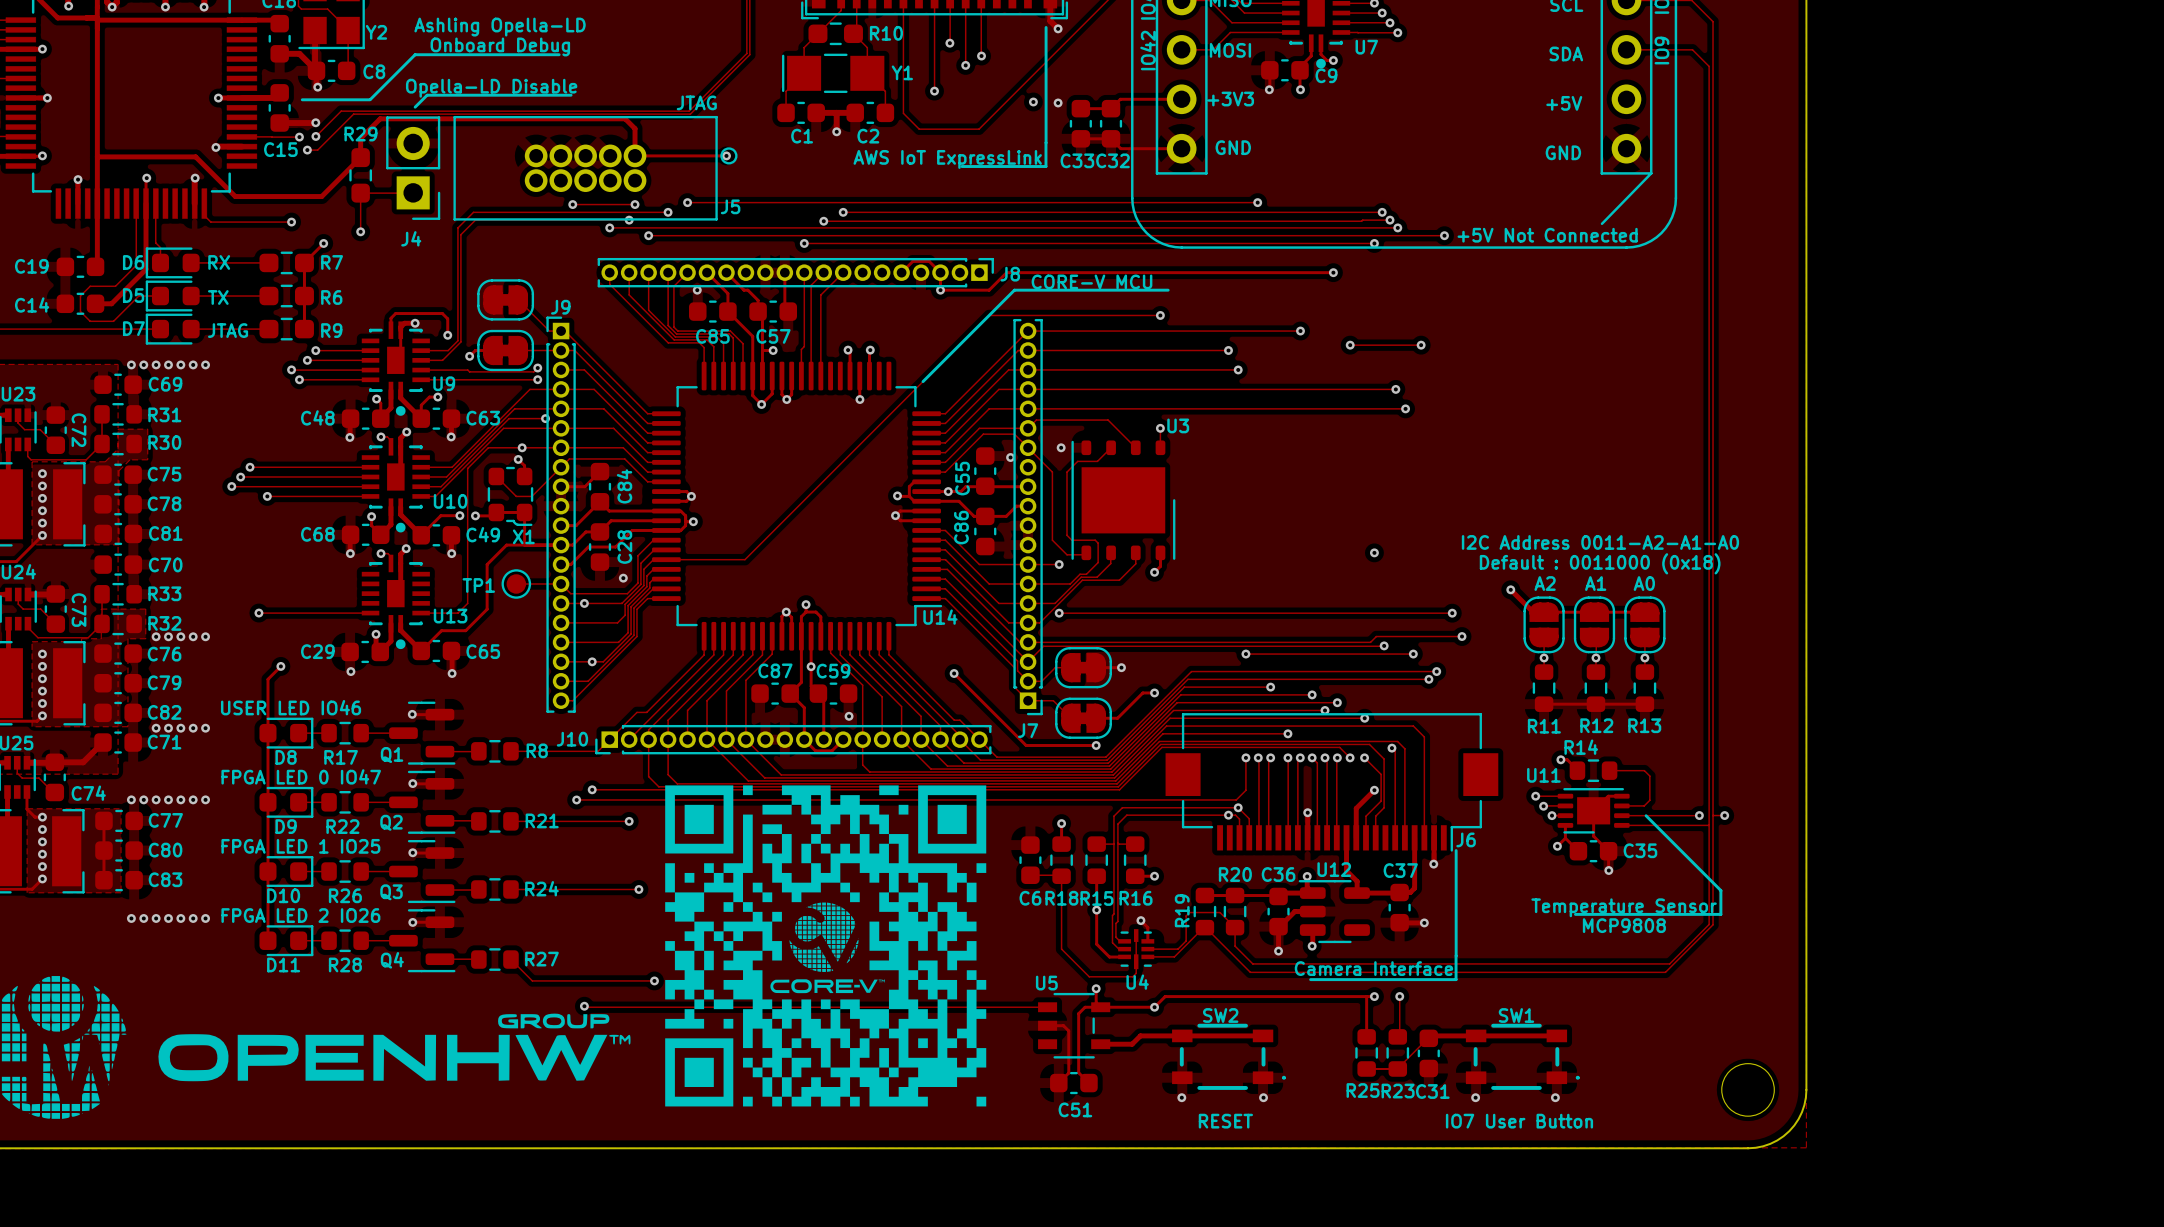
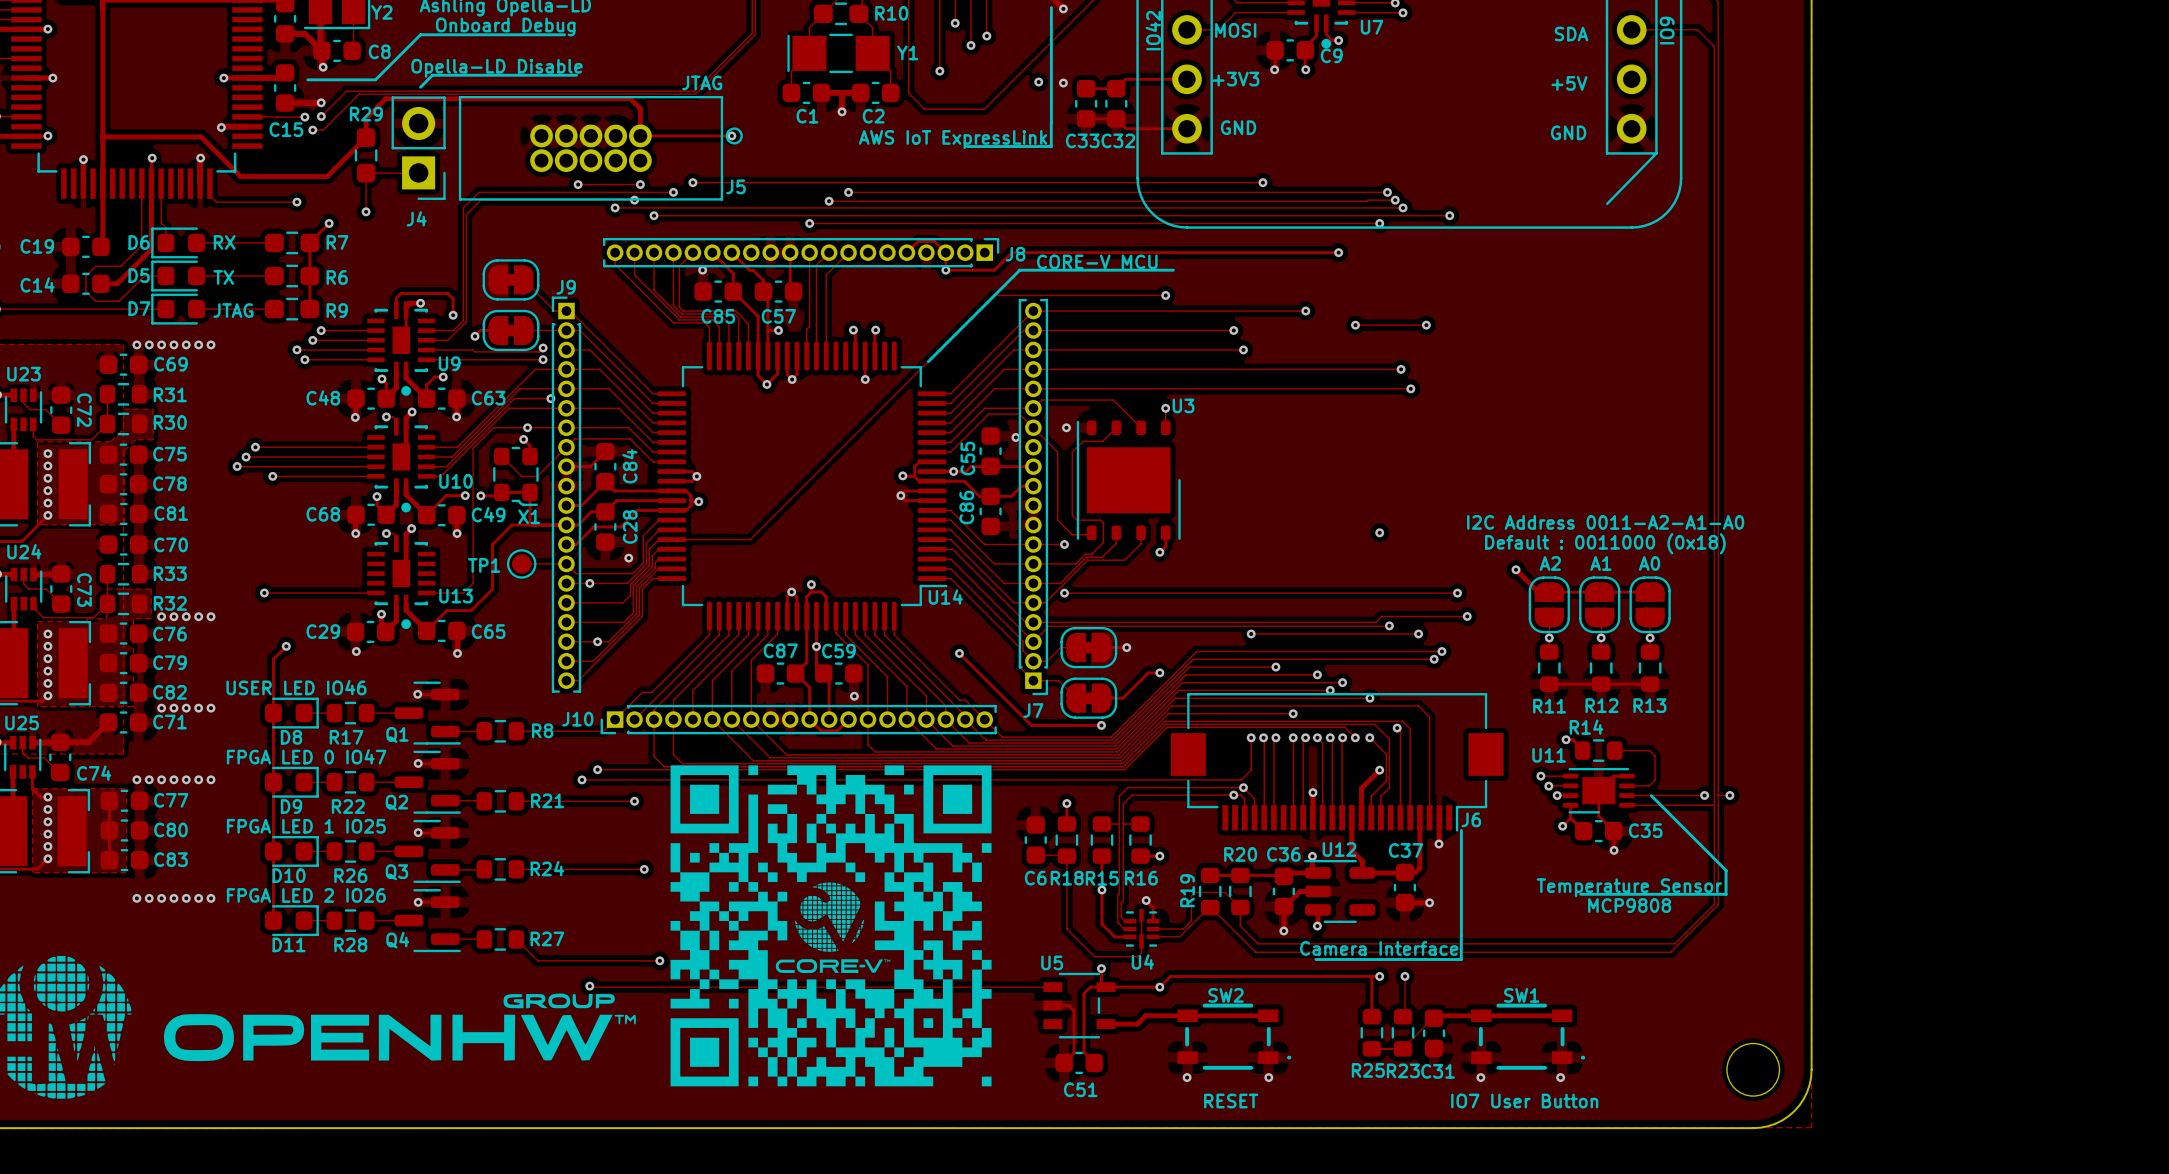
text: +5V Not Connected (1547, 235) -> none

